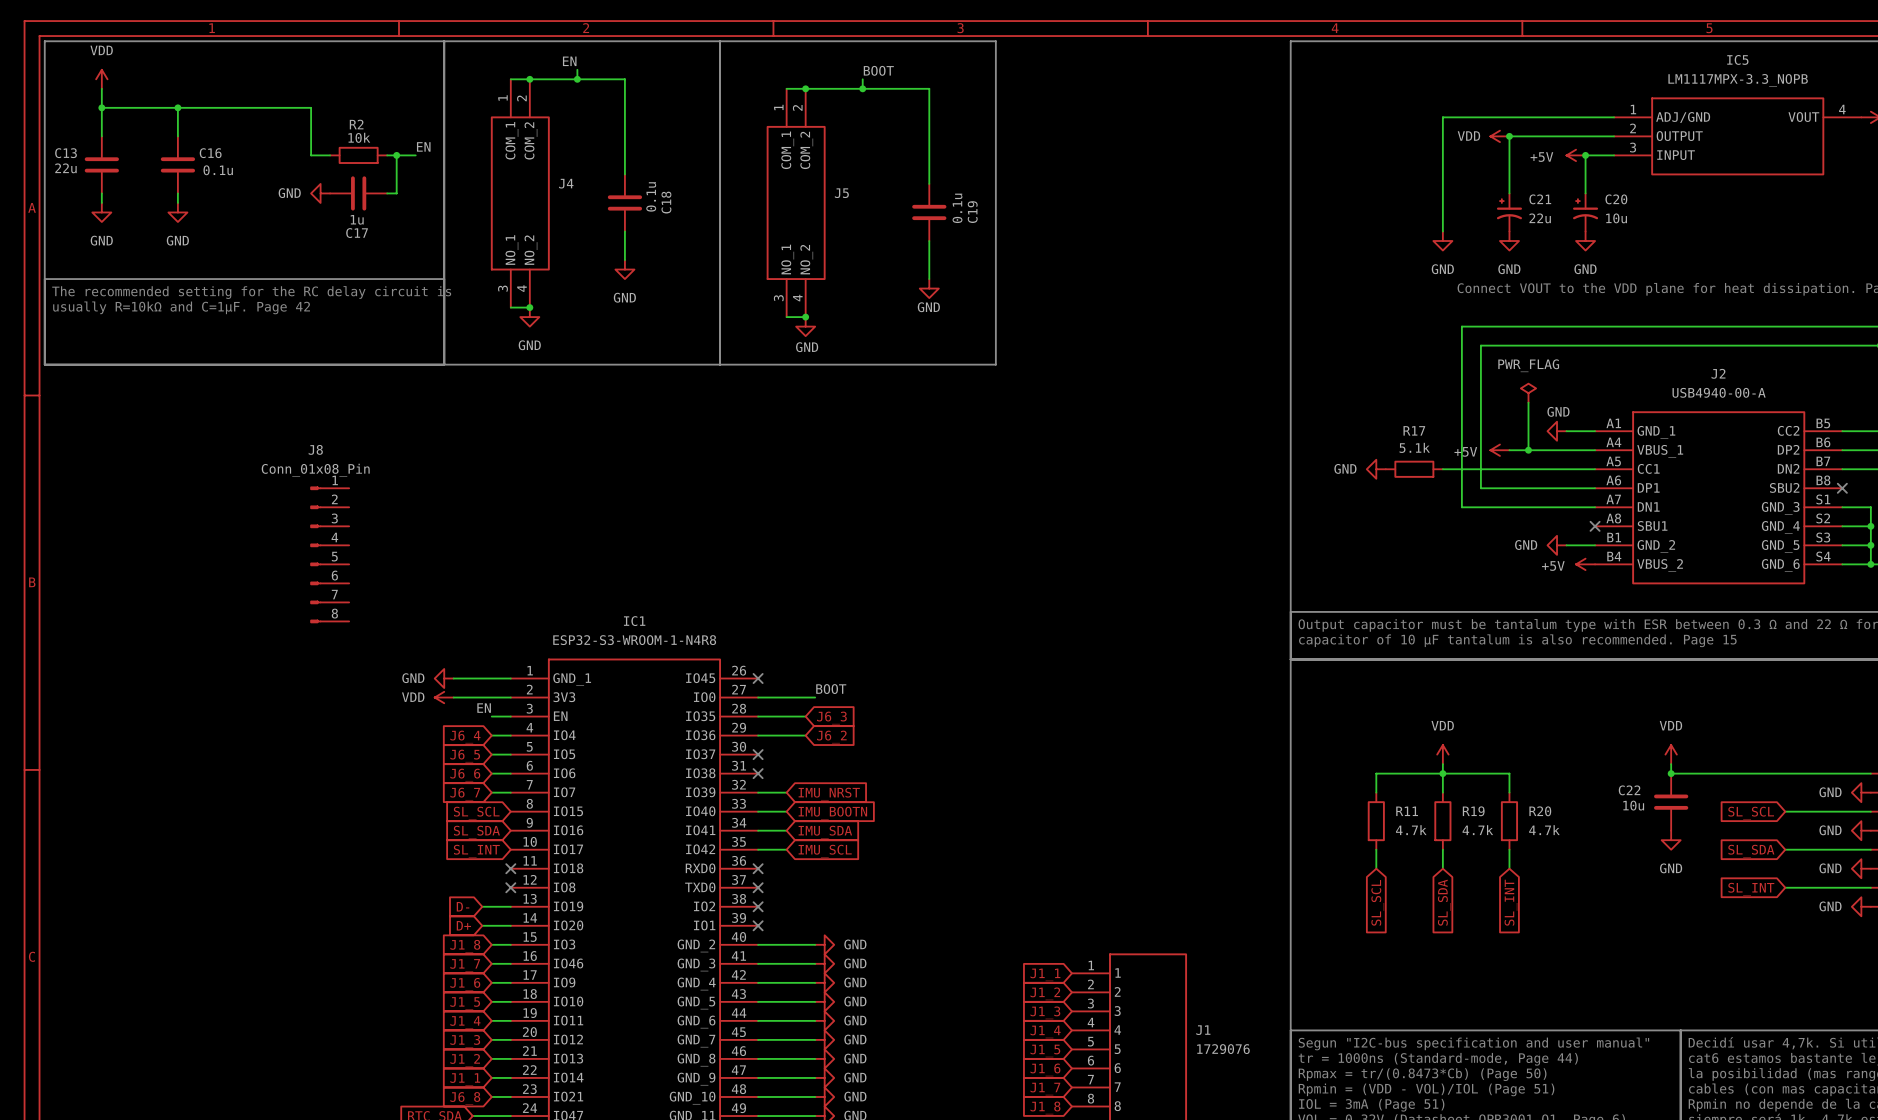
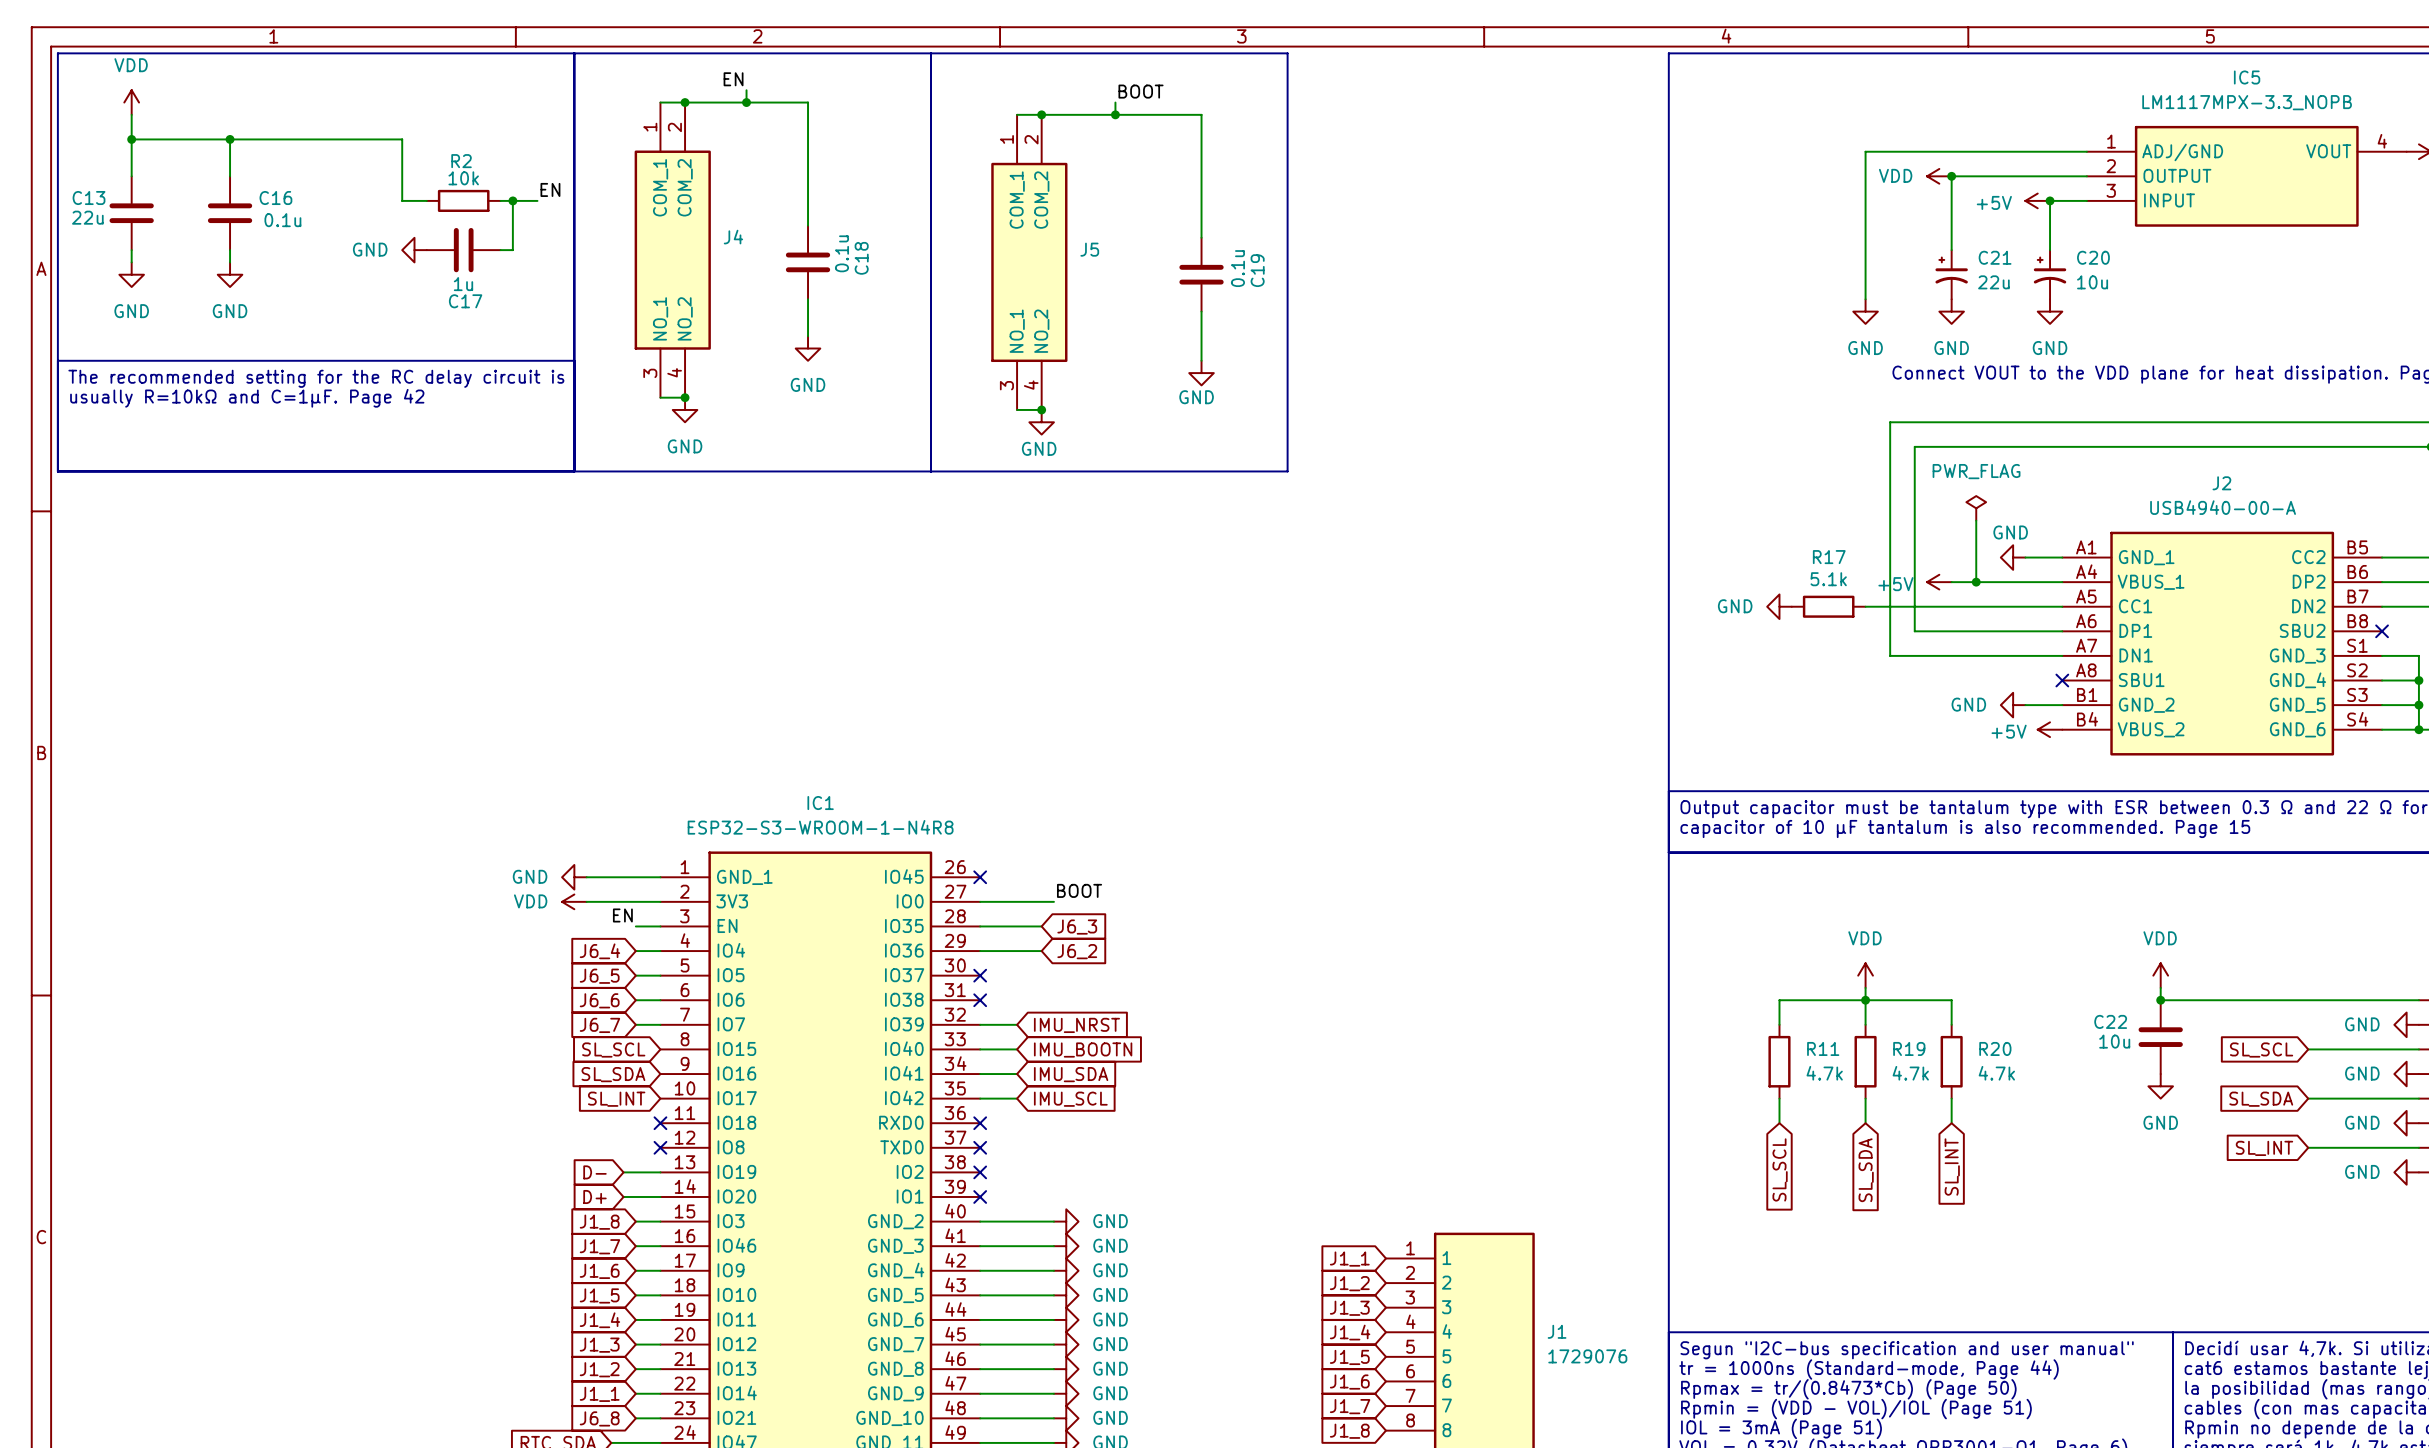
J8: Conn_01x08_Pin (329, 554) -> none

